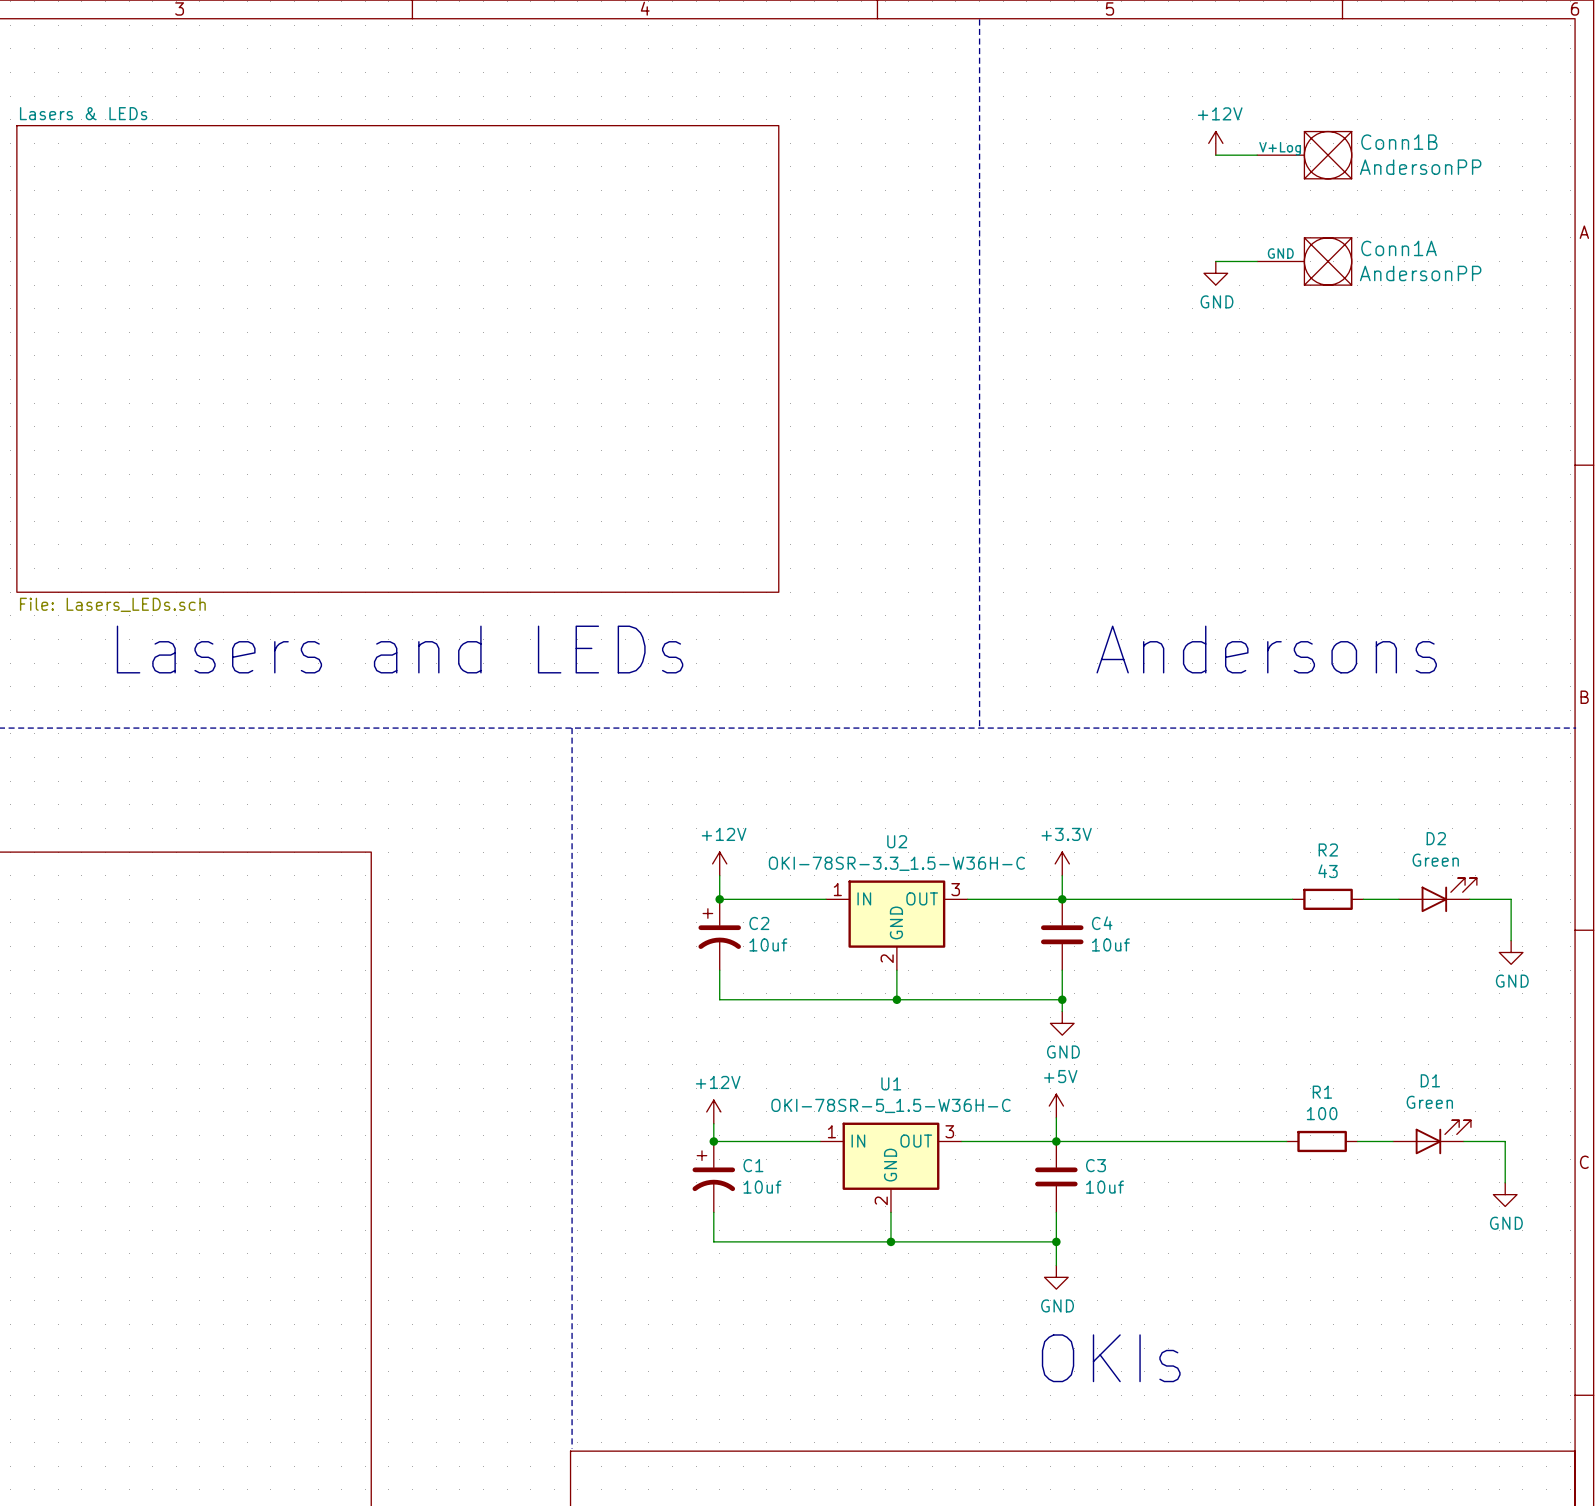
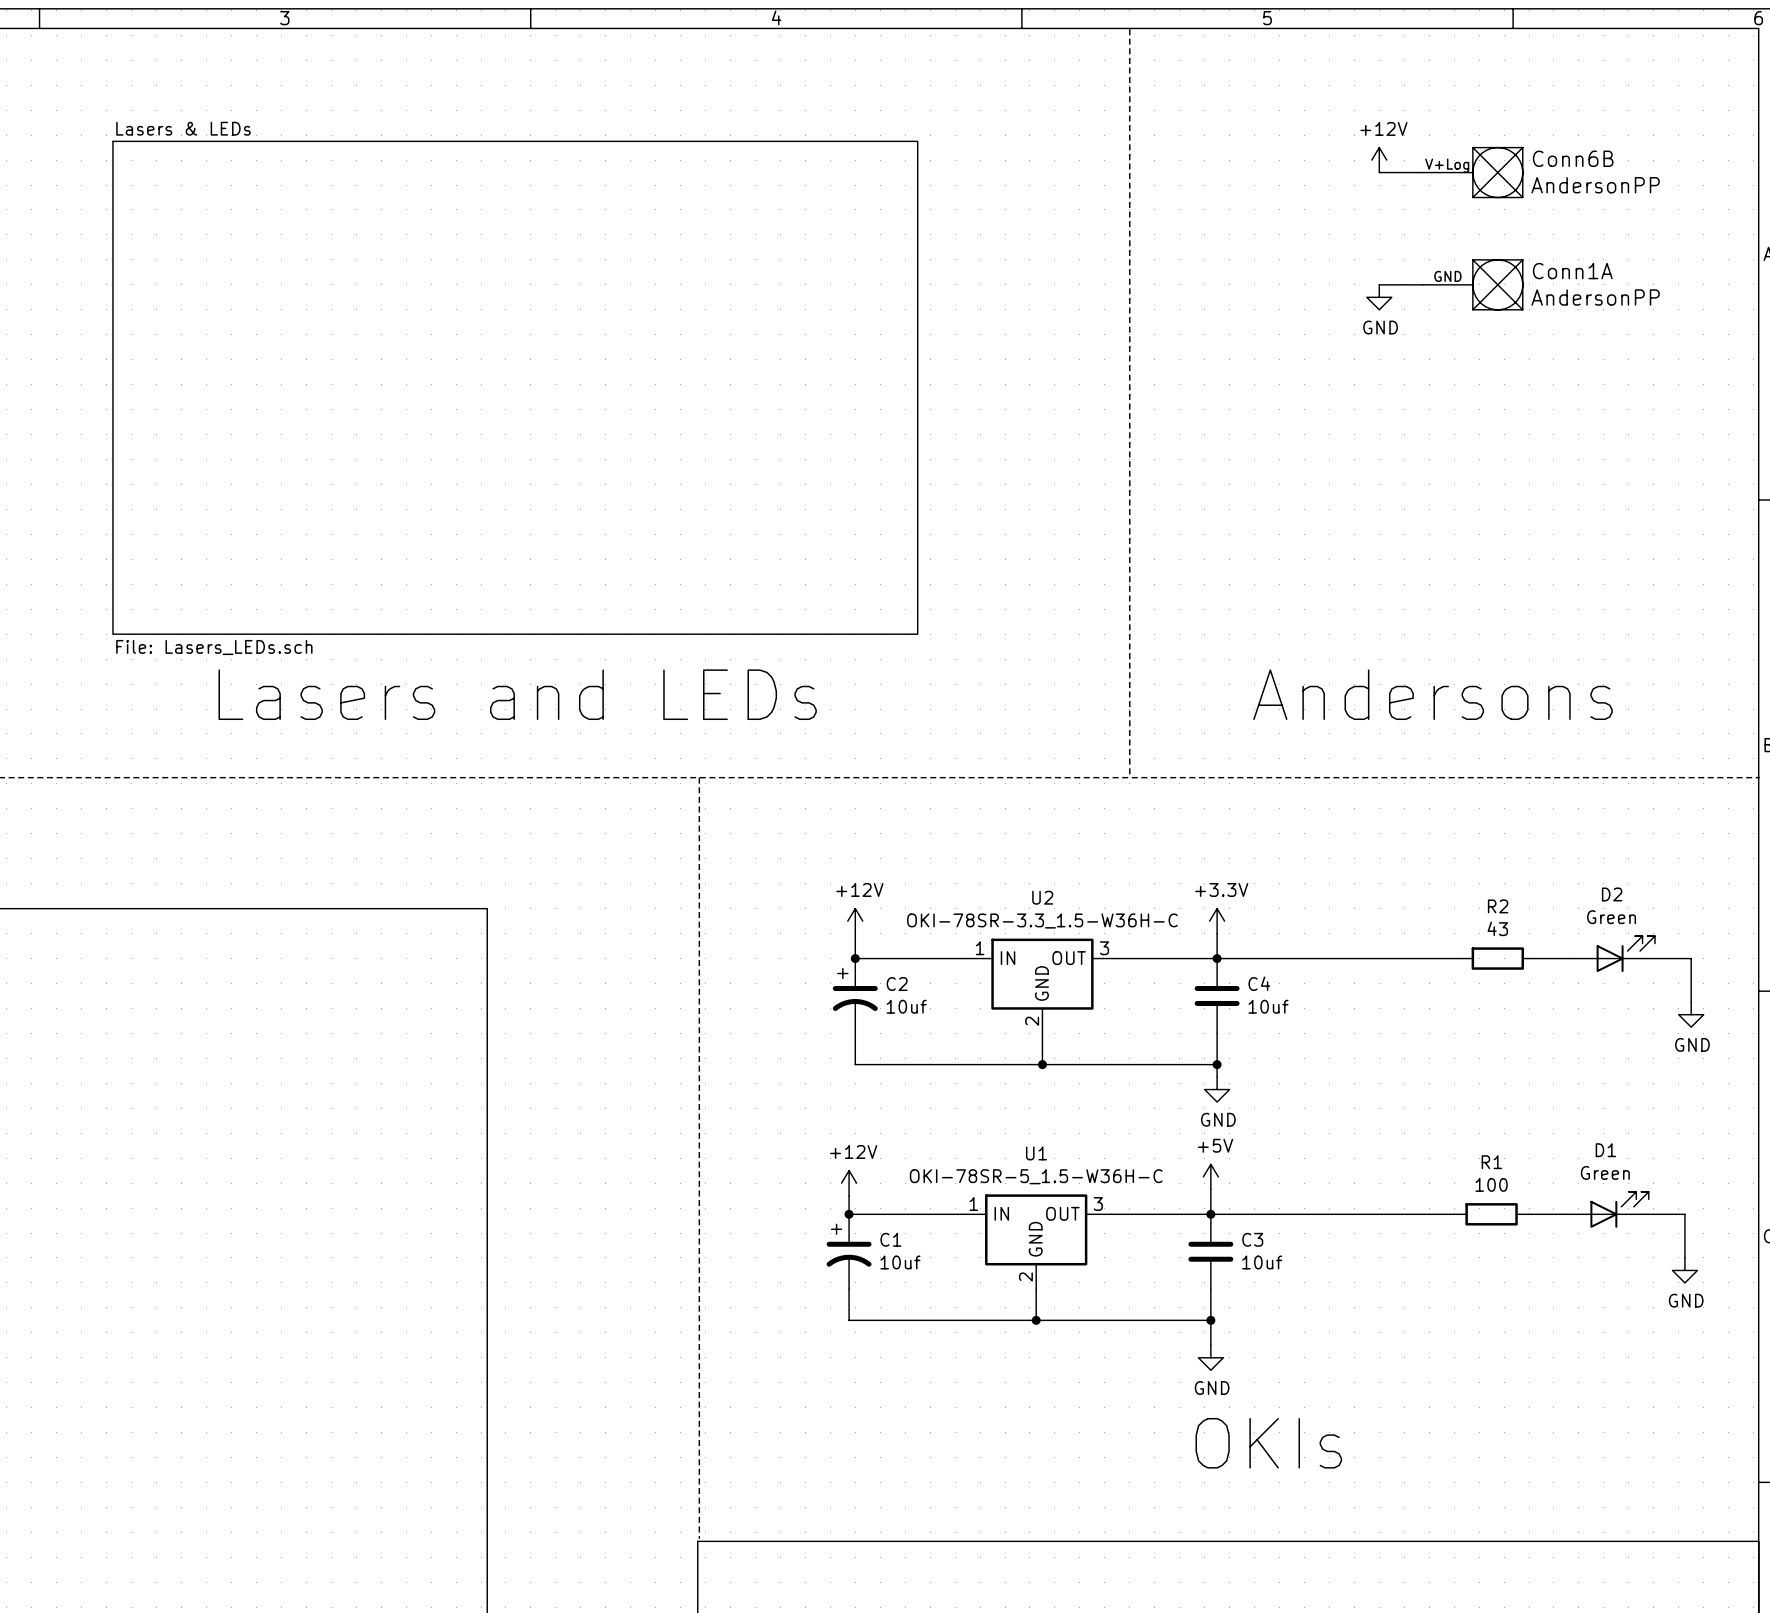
Conn1B name: Conn1B (1399, 142) -> Conn6B (1573, 158)

